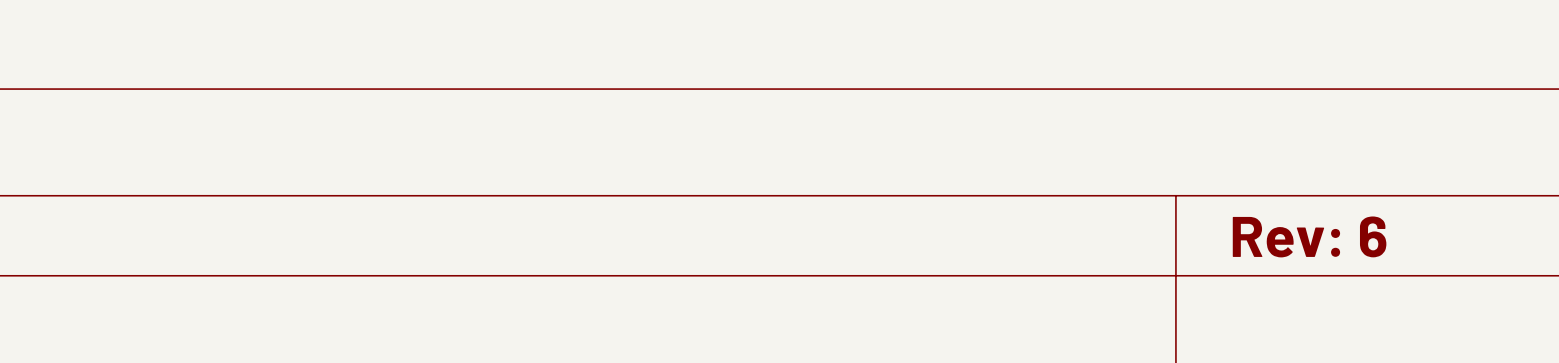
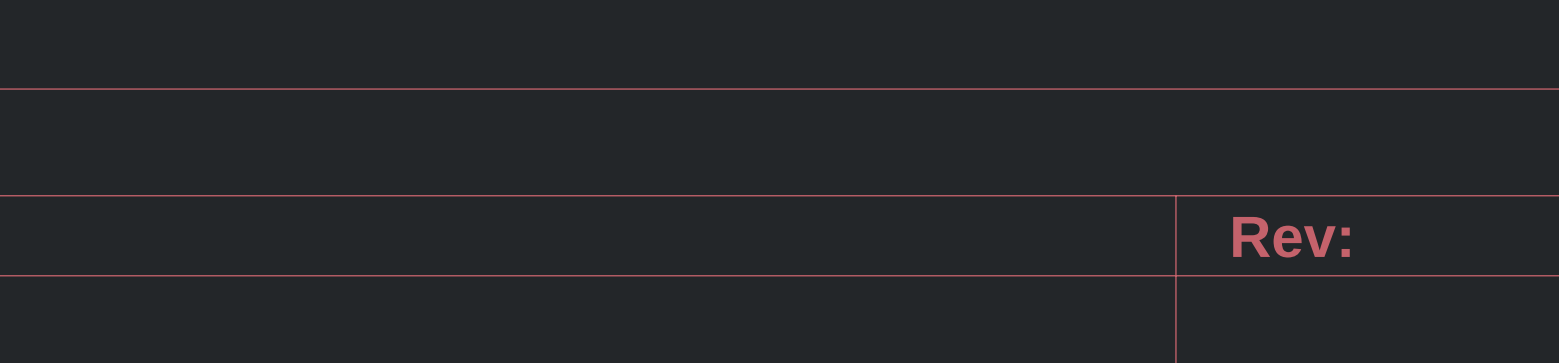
title block: Rev: 6 (1309, 236) -> Rev: (1291, 237)

